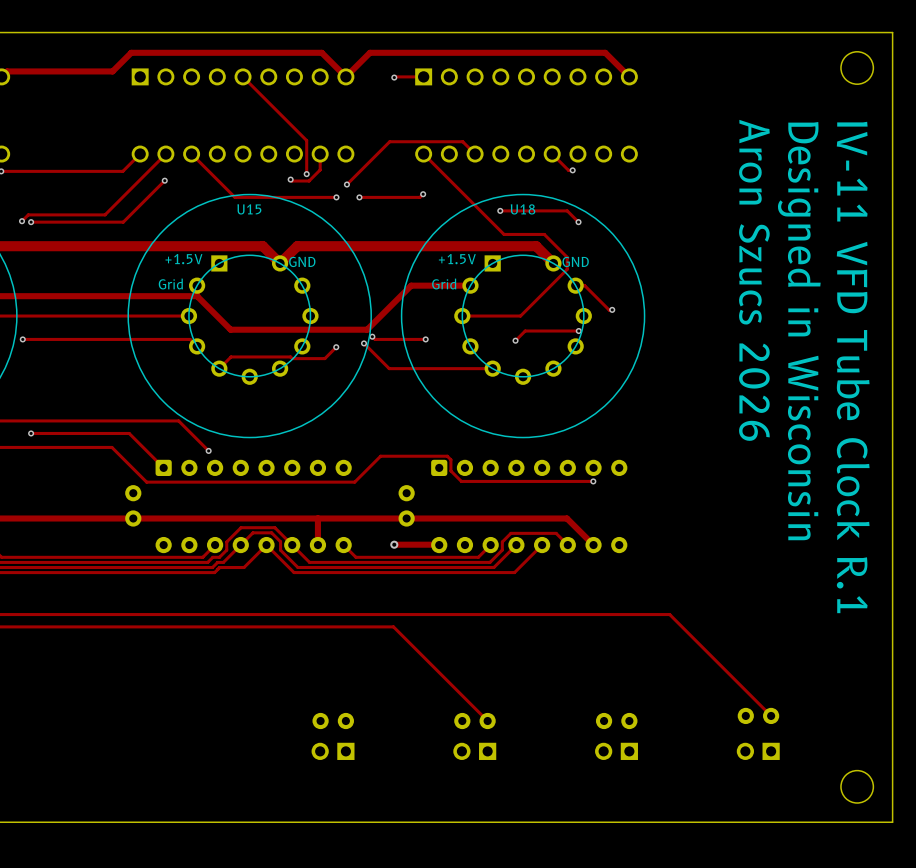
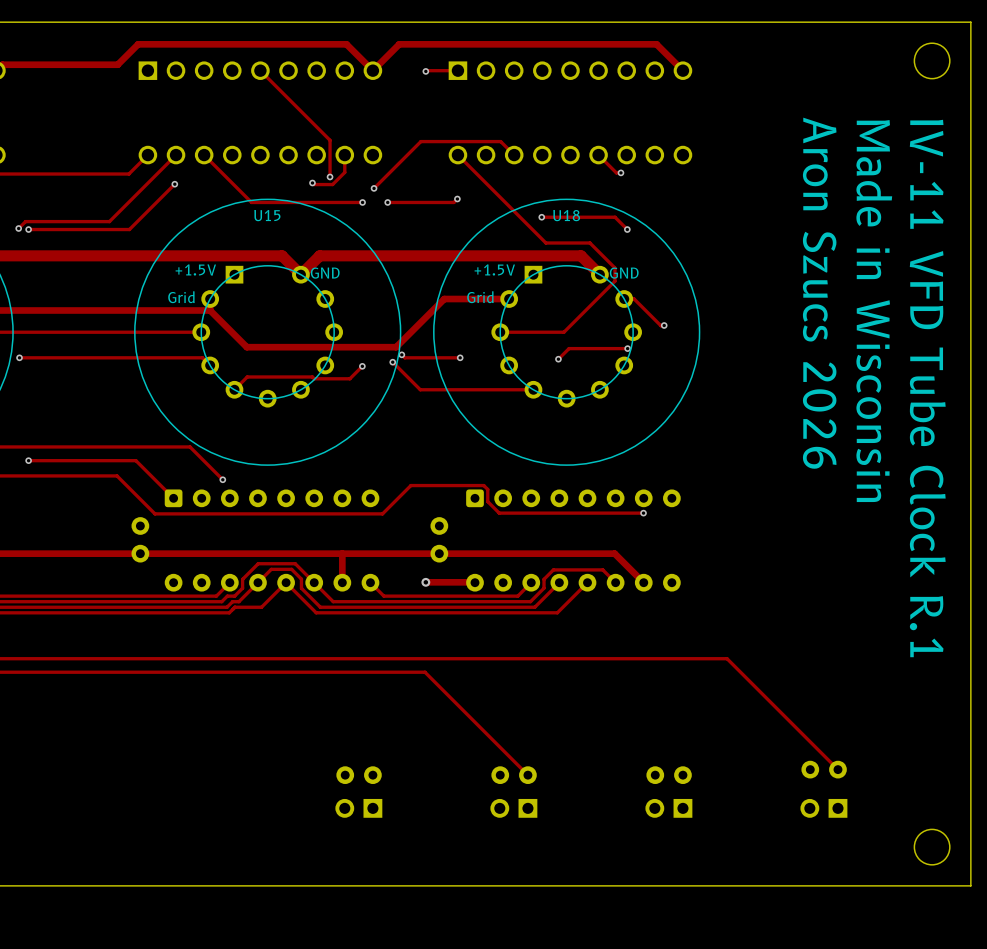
text: Designed in Wisconsin (799, 331) -> Made in Wisconsin (874, 311)

